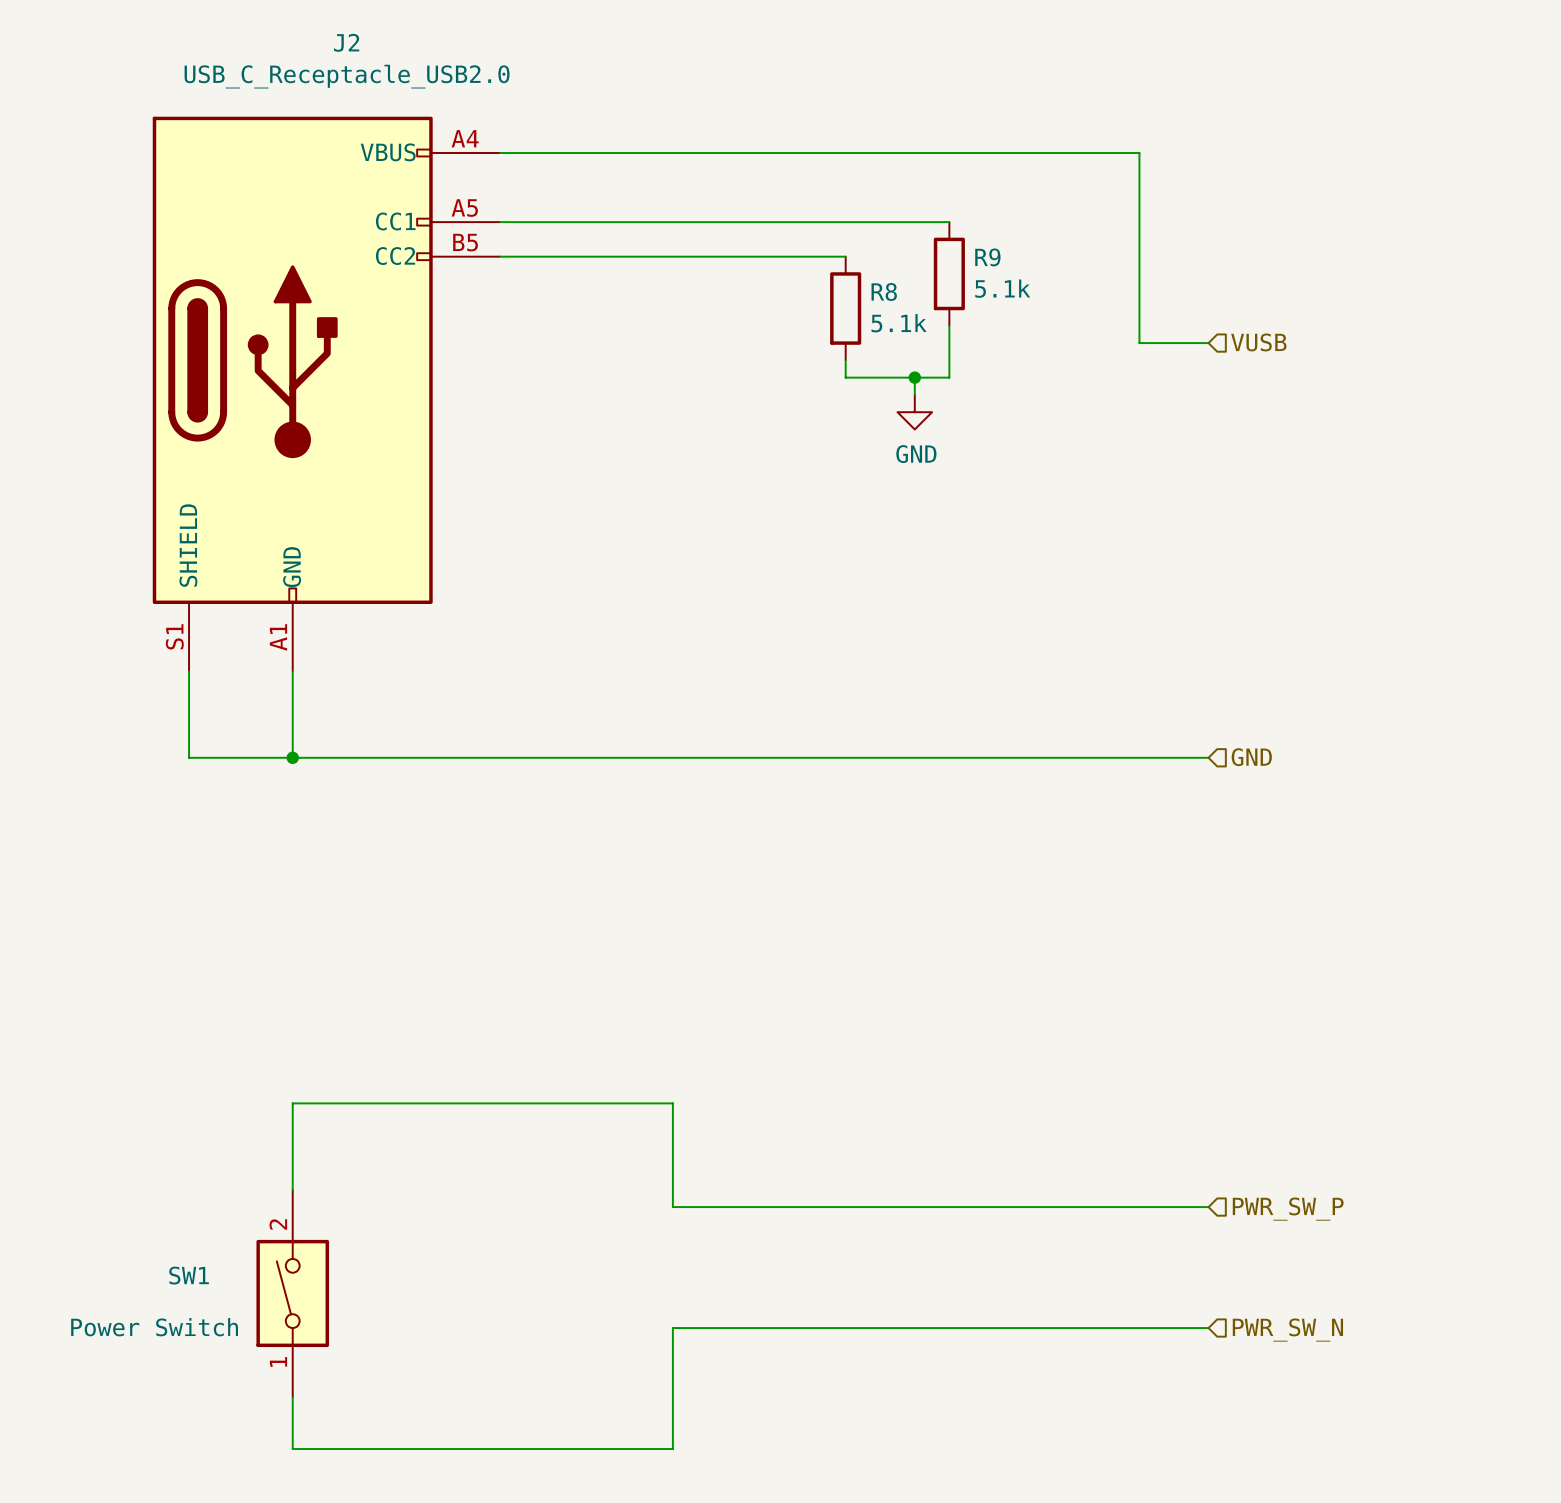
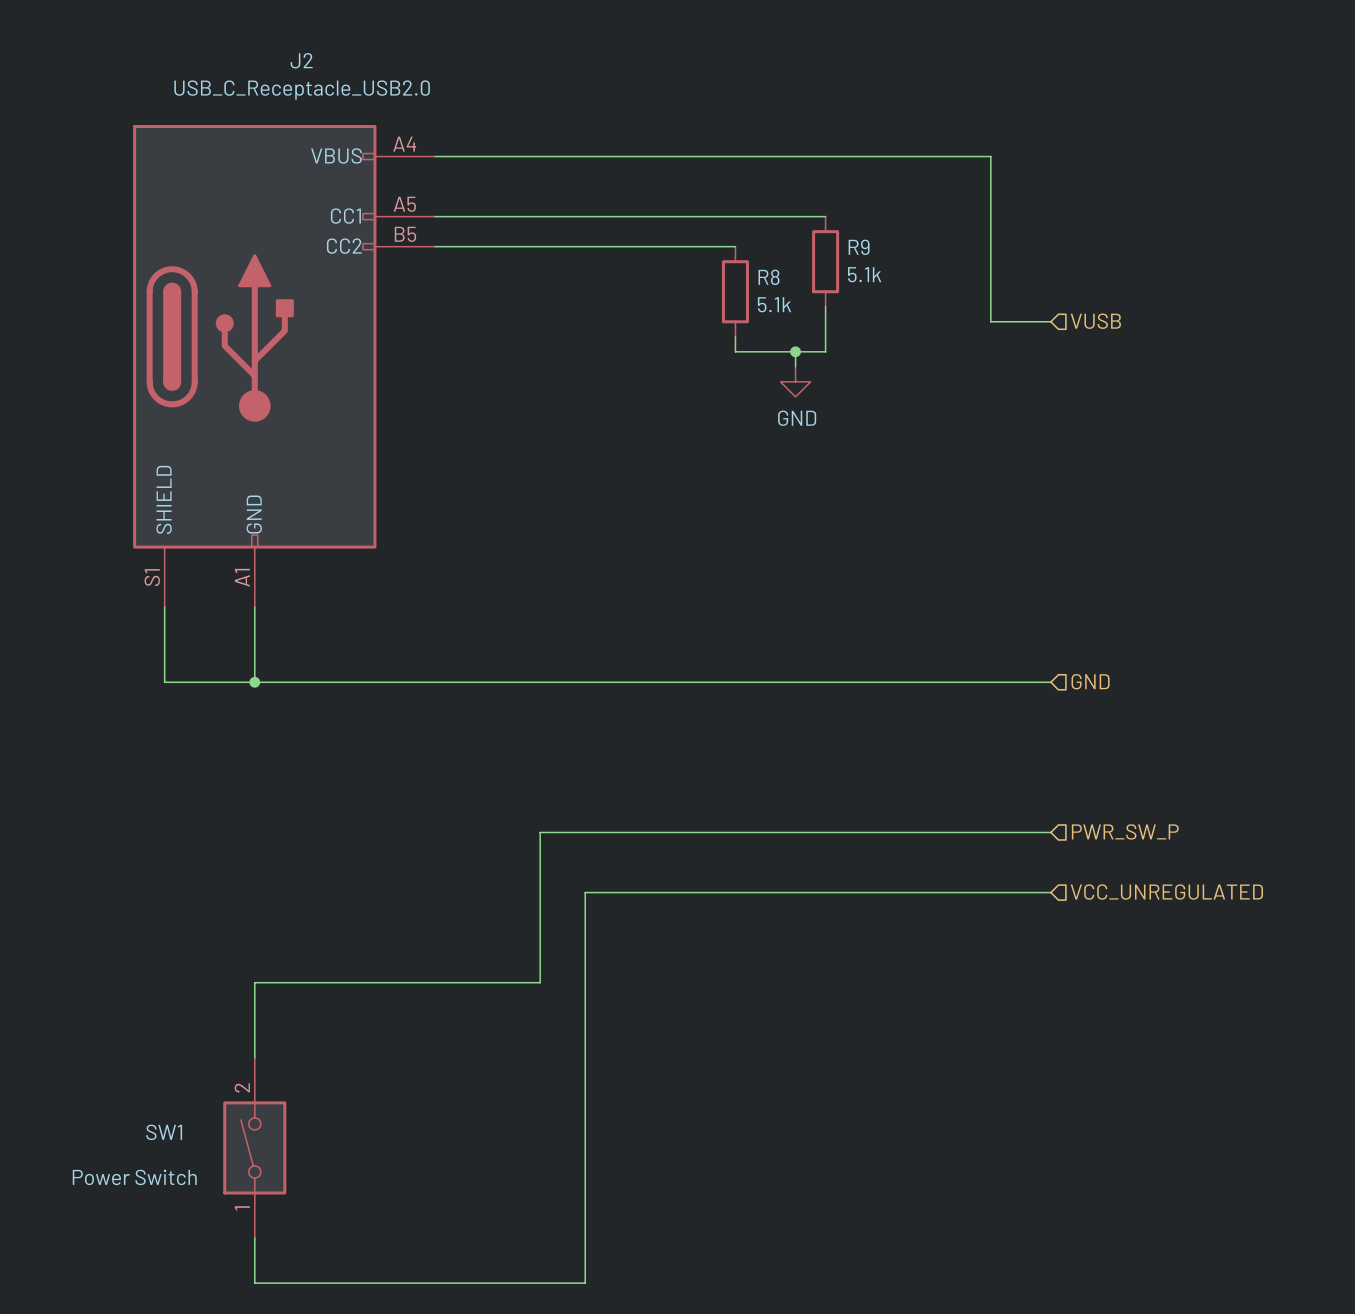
wire: none -> (1050, 892) (585, 892) (585, 982)
hierarchical label: none -> VCC_UNREGULATED (1166, 892)
wire: (621, 1103) (672, 1103) -> (540, 982) (540, 832) (1050, 832)
wire: (672, 1207) (1208, 1207) -> (585, 1072) (585, 1177)
hierarchical label position: PWR_SW_P (1288, 1209) -> PWR_SW_P (1125, 831)
wire: (672, 1328) (1208, 1328) -> none
hierarchical label: PWR_SW_N (1287, 1330) -> none

